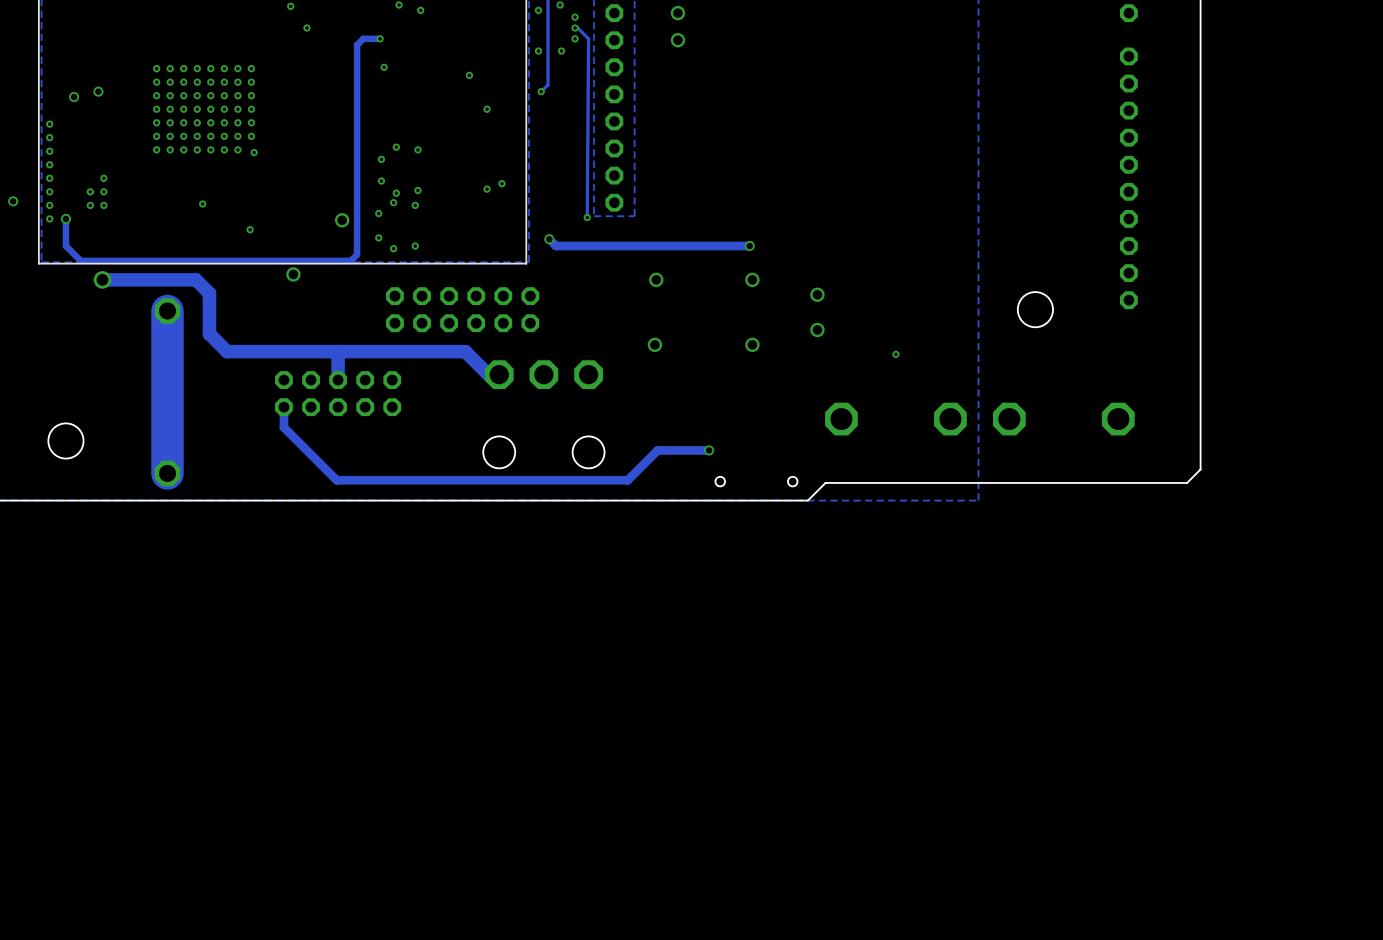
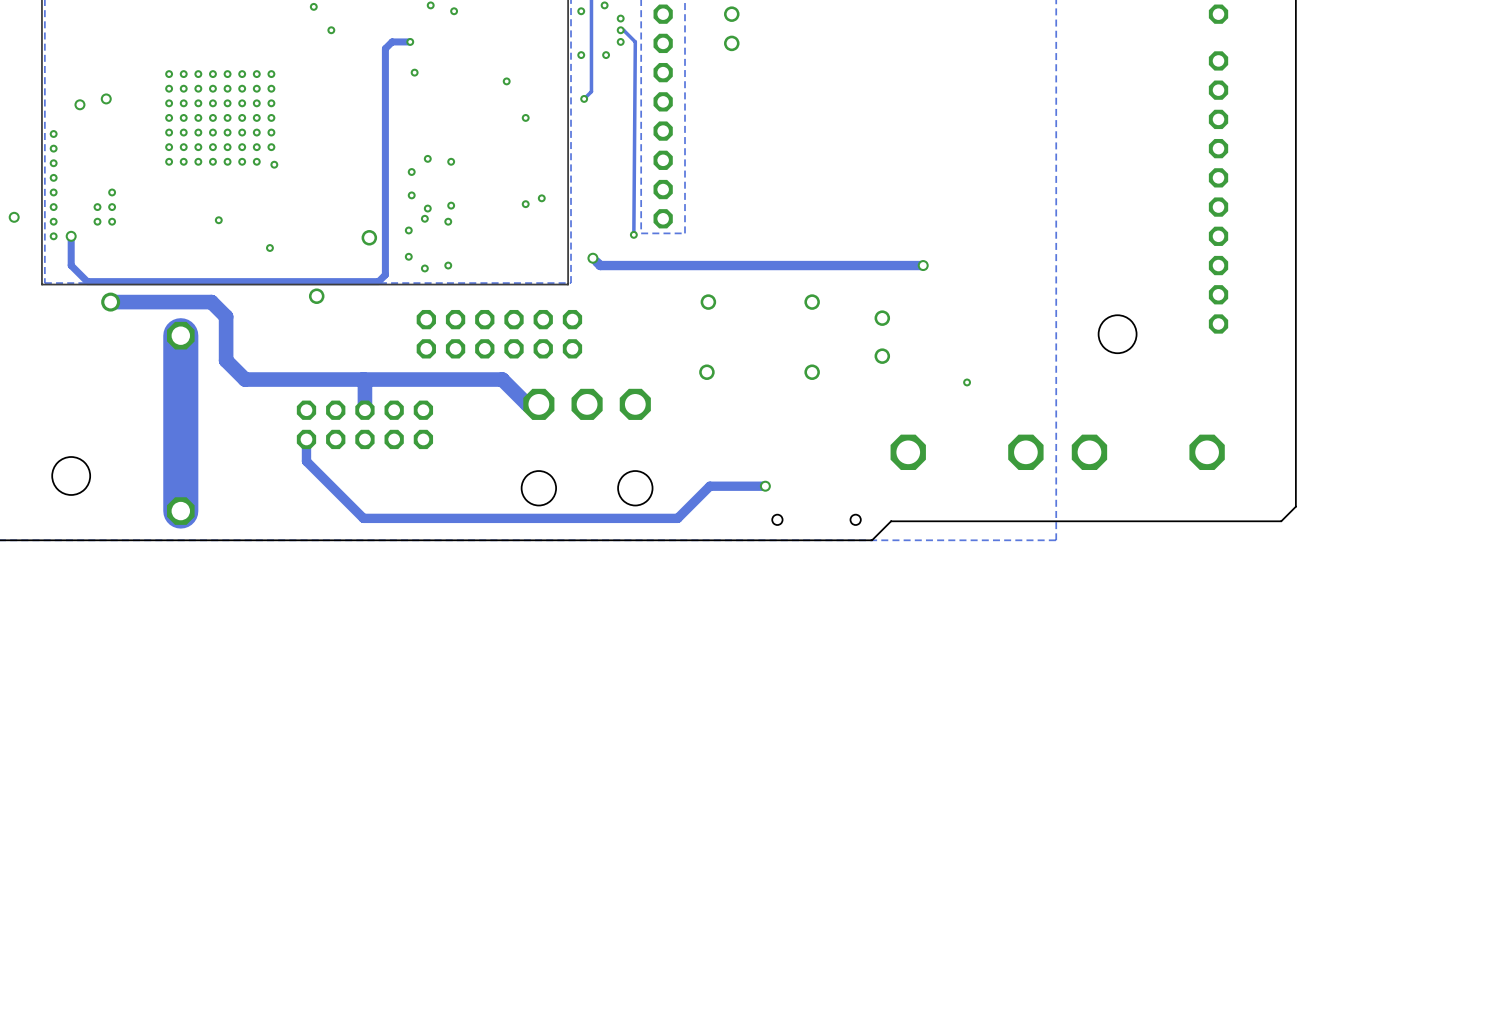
via: (749, 246) -> none
track: none -> (923, 265) (809, 265)
via: none -> (923, 265)

